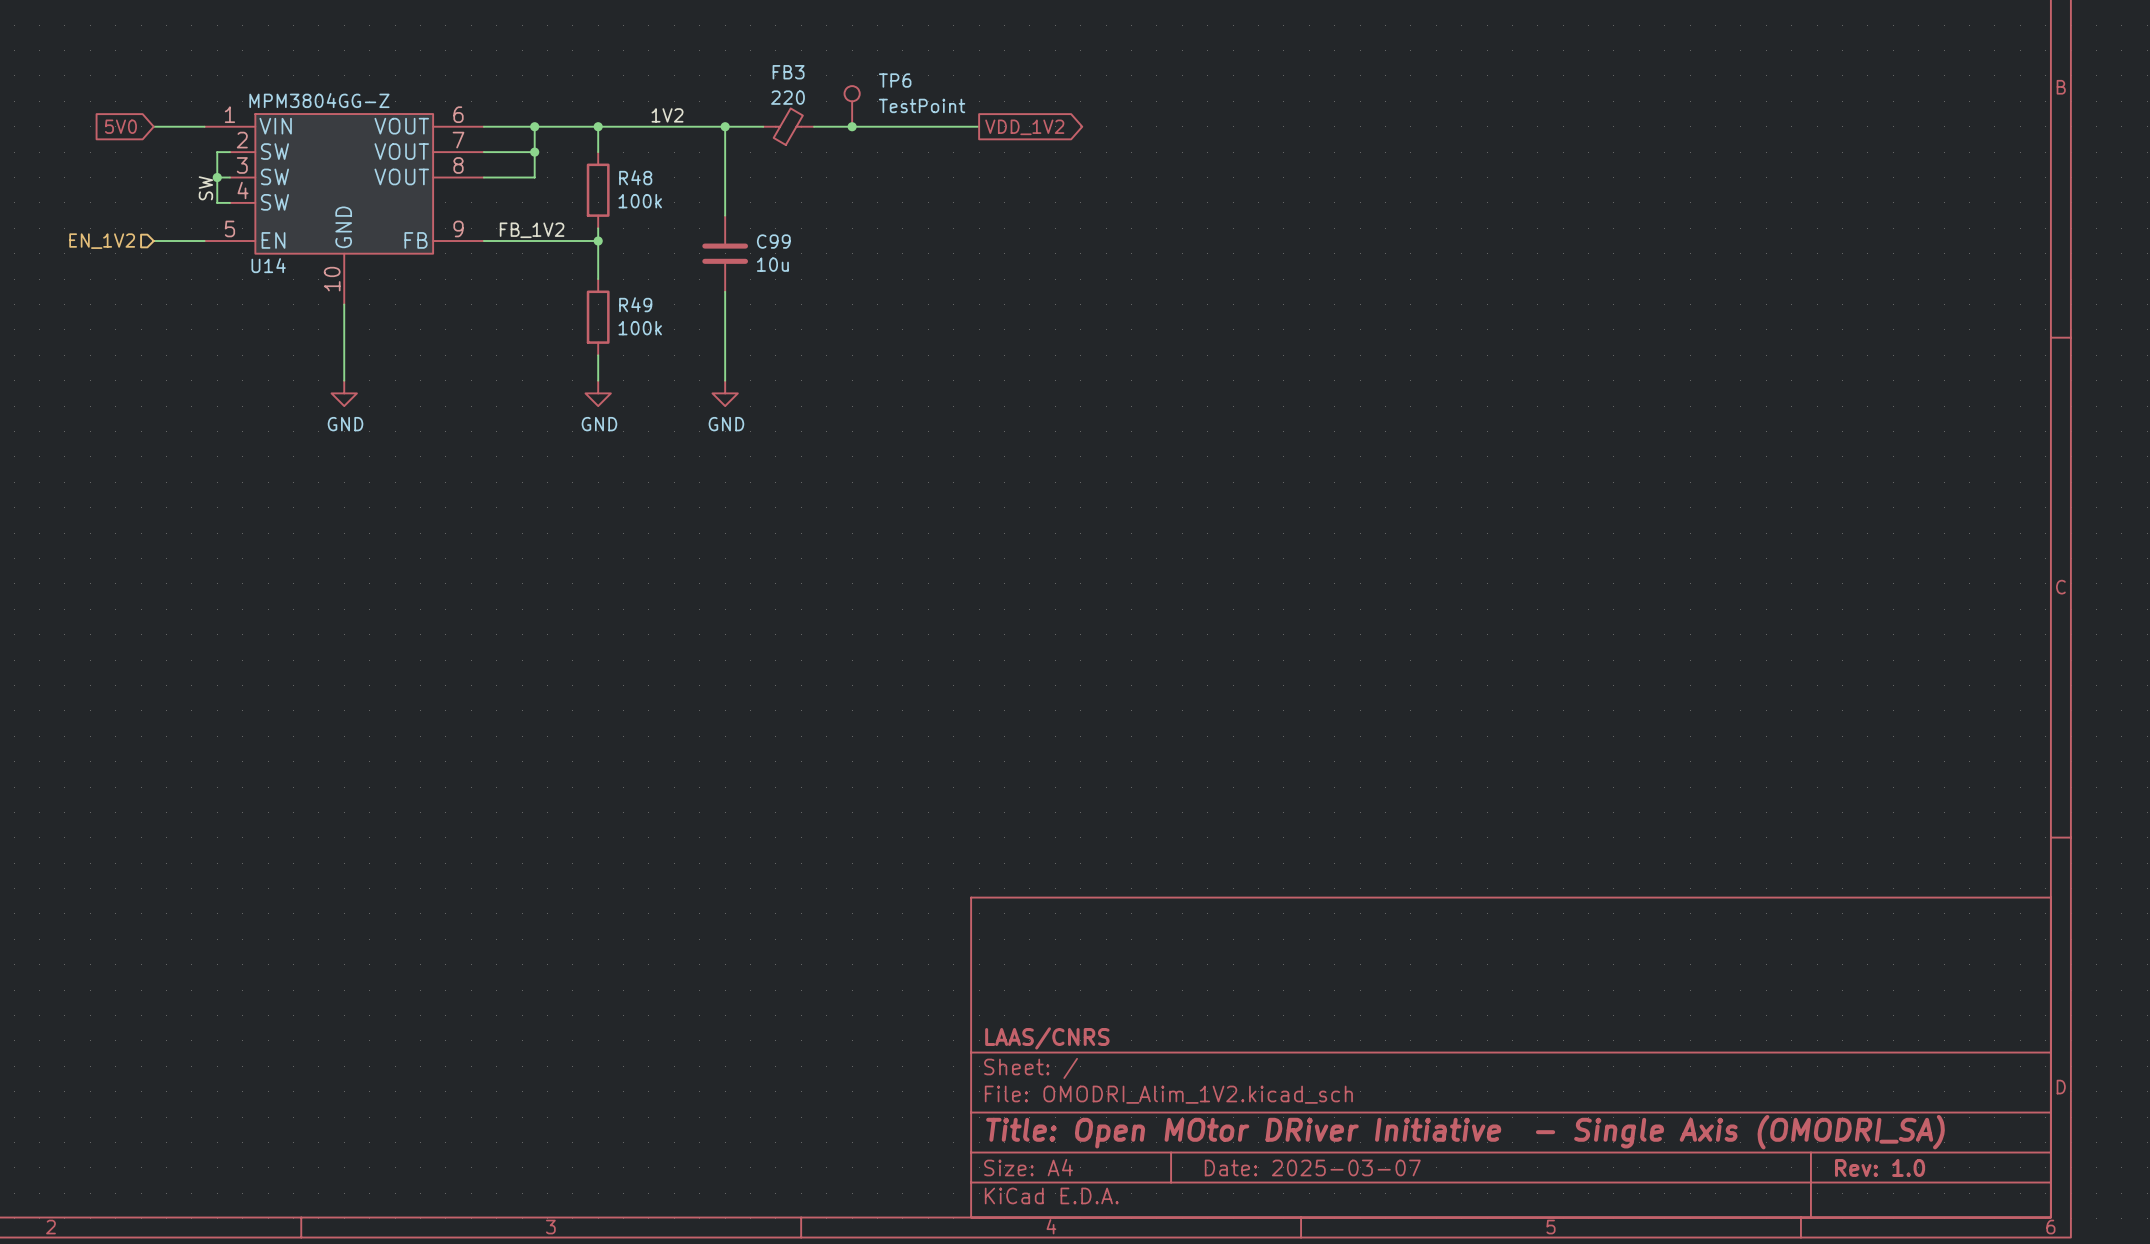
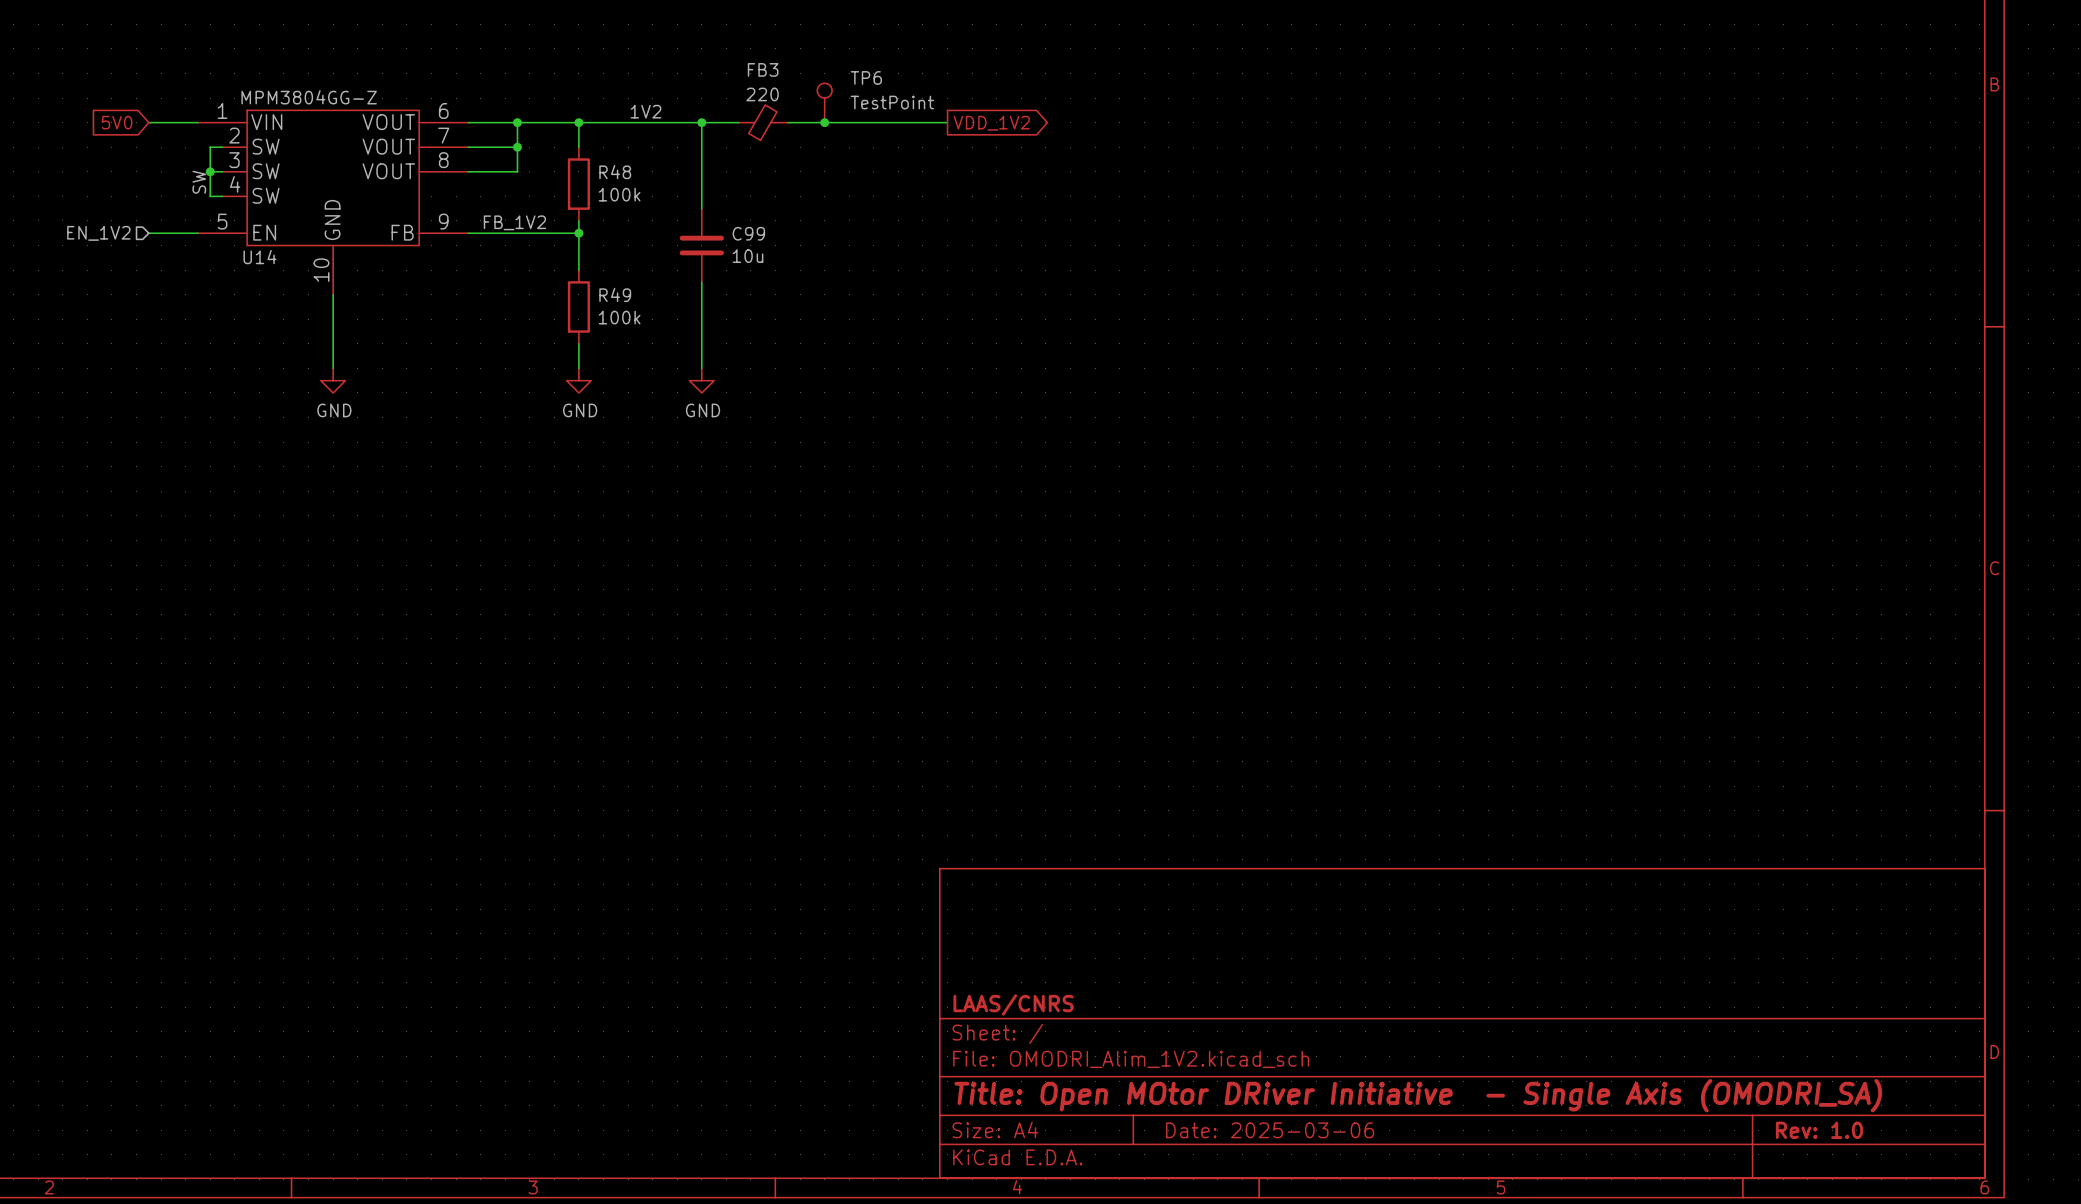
title block: Date: 2025-03-07 (1312, 1167) -> Date: 2025-03-06 (1270, 1130)

